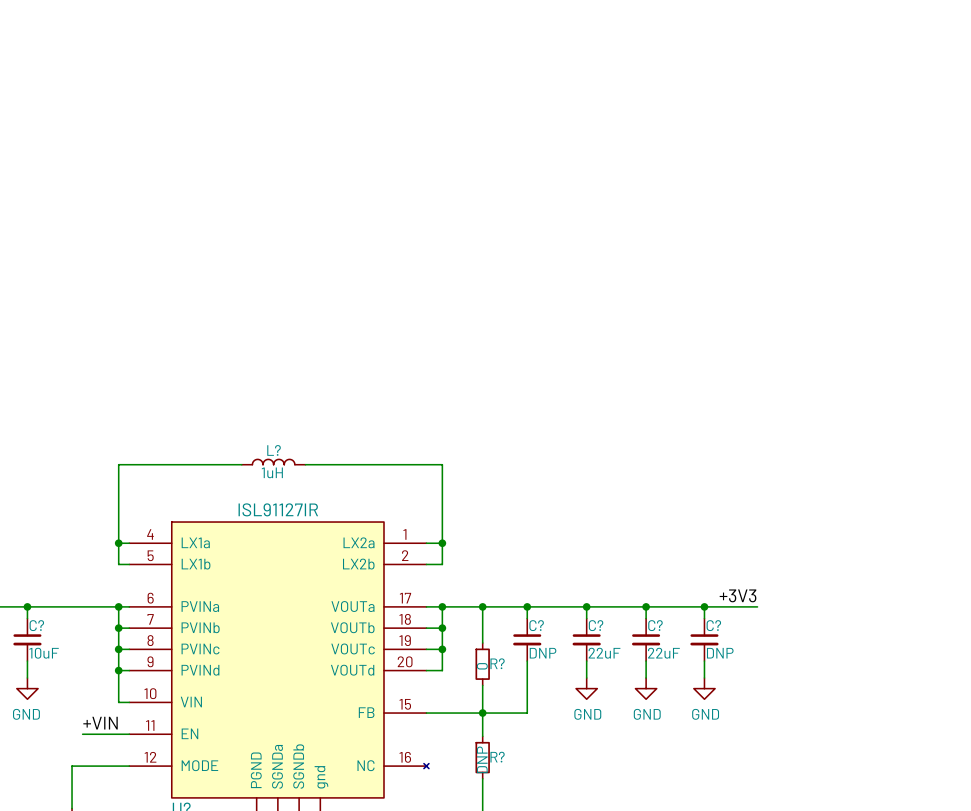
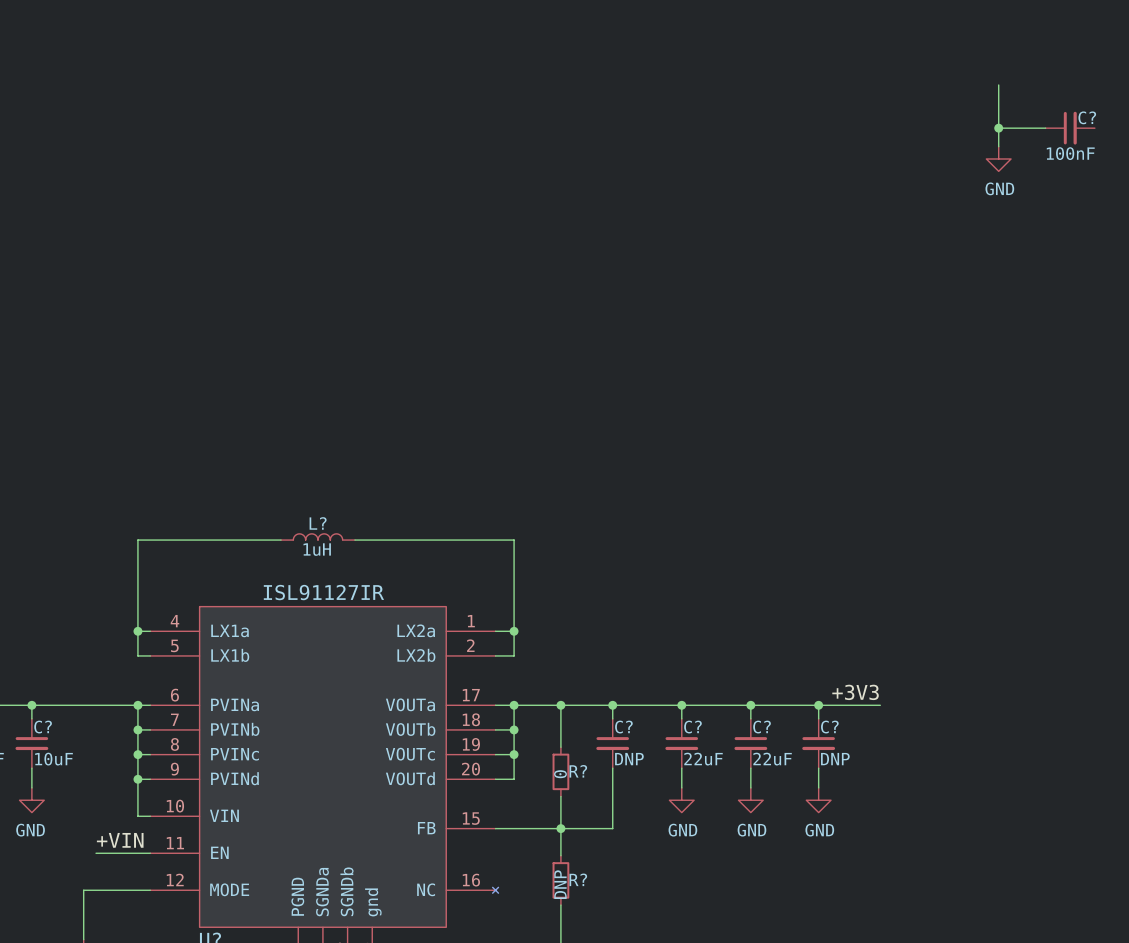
wire: none -> (998, 85) (998, 146)
wire: none -> (998, 128) (1045, 128)
junction: none -> (998, 128)
C?: none -> 100nF (1070, 128)
power symbol: none -> GND (998, 159)

